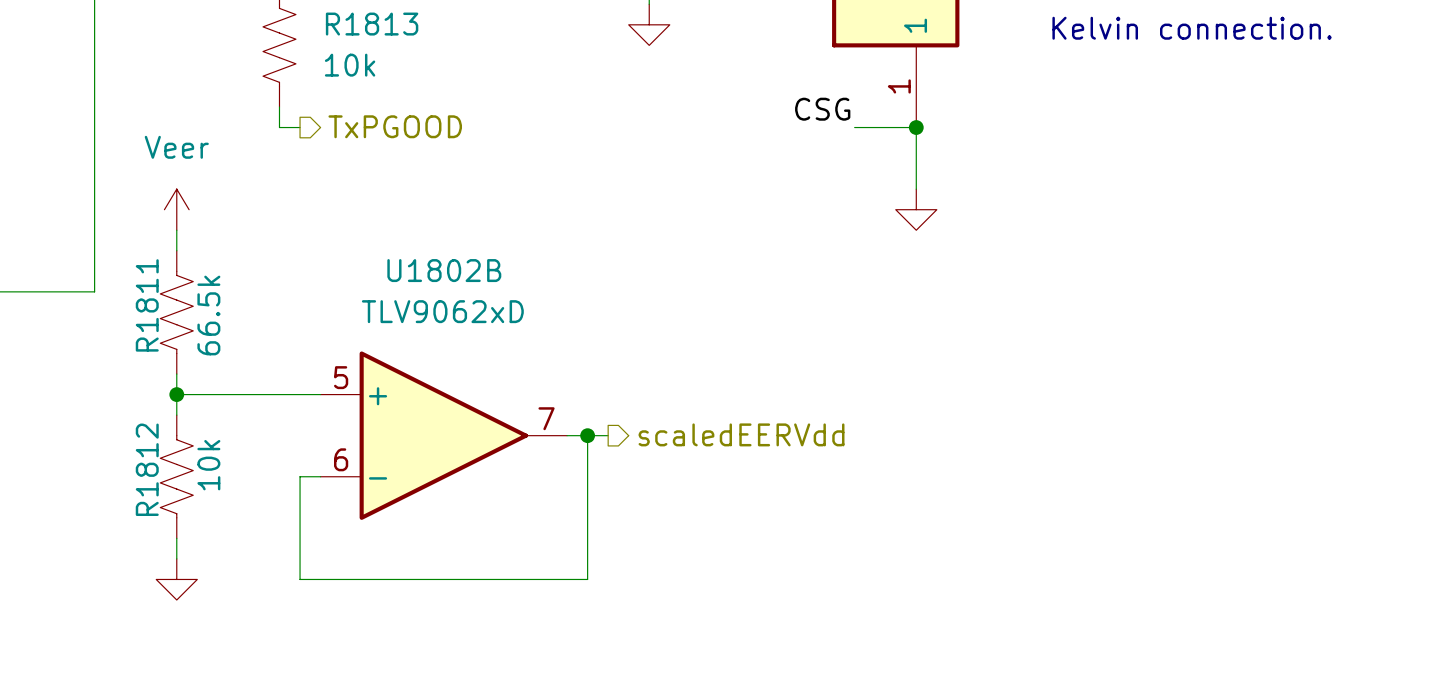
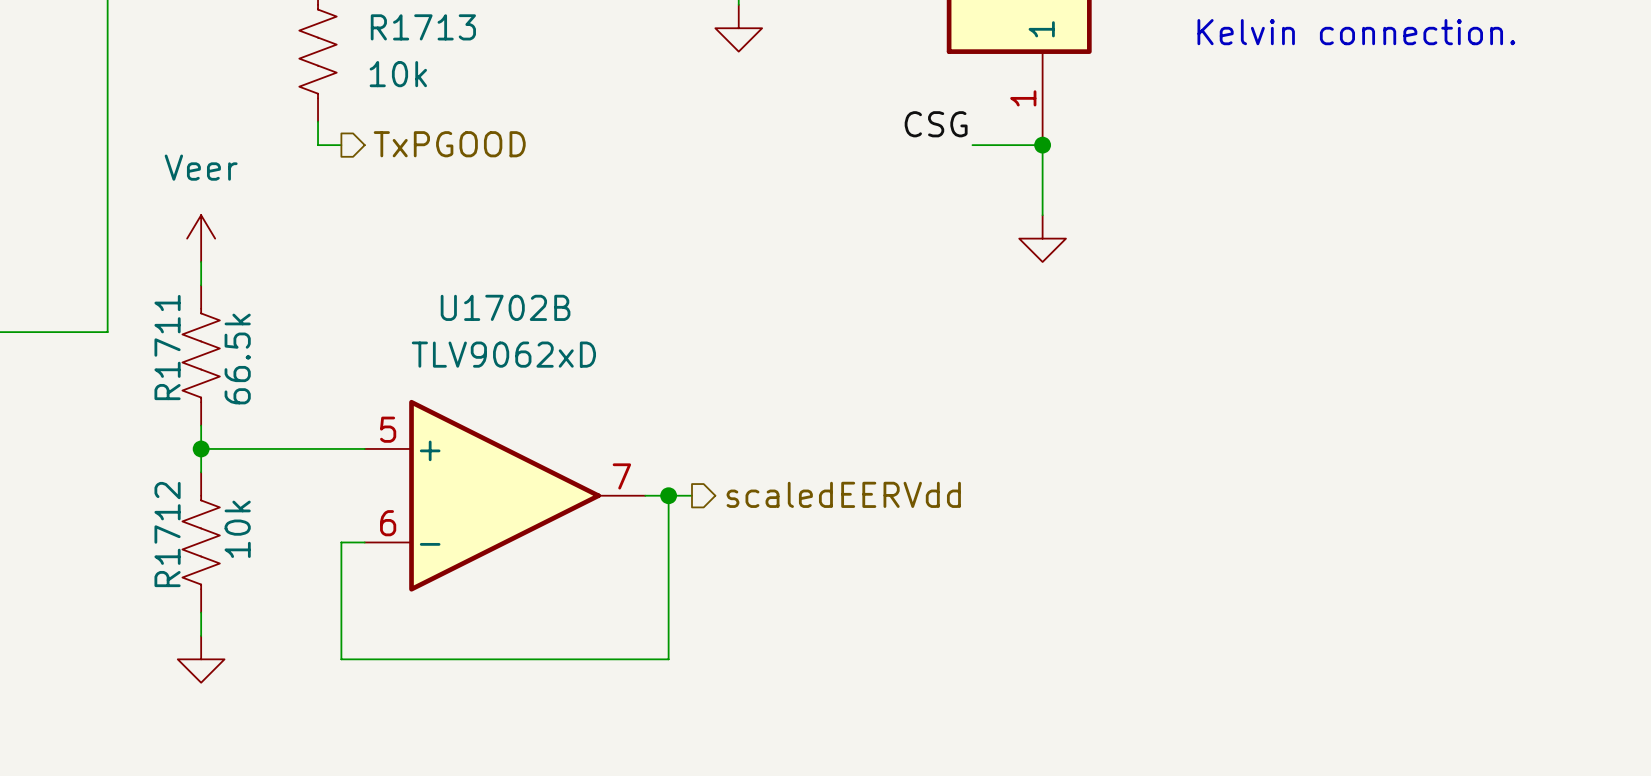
R1813 name: R1813 (372, 24) -> R1713 (423, 27)
U1802B name: U1802B (444, 270) -> U1702B (505, 307)
R1811 name: R1811 (147, 305) -> R1711 (167, 347)
R1812 name: R1812 (147, 469) -> R1712 (167, 534)

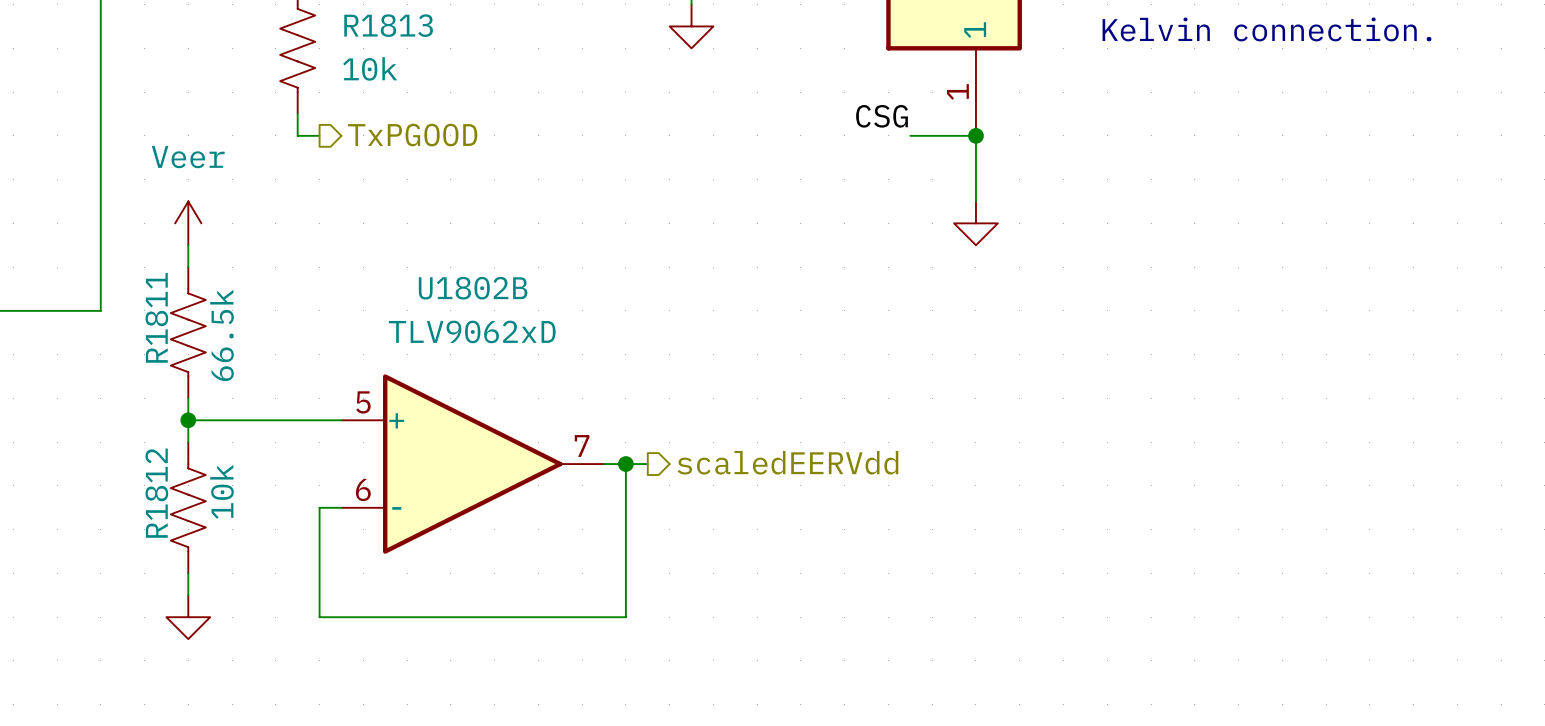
R1713 name: R1713 (423, 27) -> R1813 (388, 25)
U1702B name: U1702B (505, 307) -> U1802B (473, 288)
R1711 name: R1711 (167, 347) -> R1811 (156, 317)
R1712 name: R1712 (167, 534) -> R1812 (156, 493)

